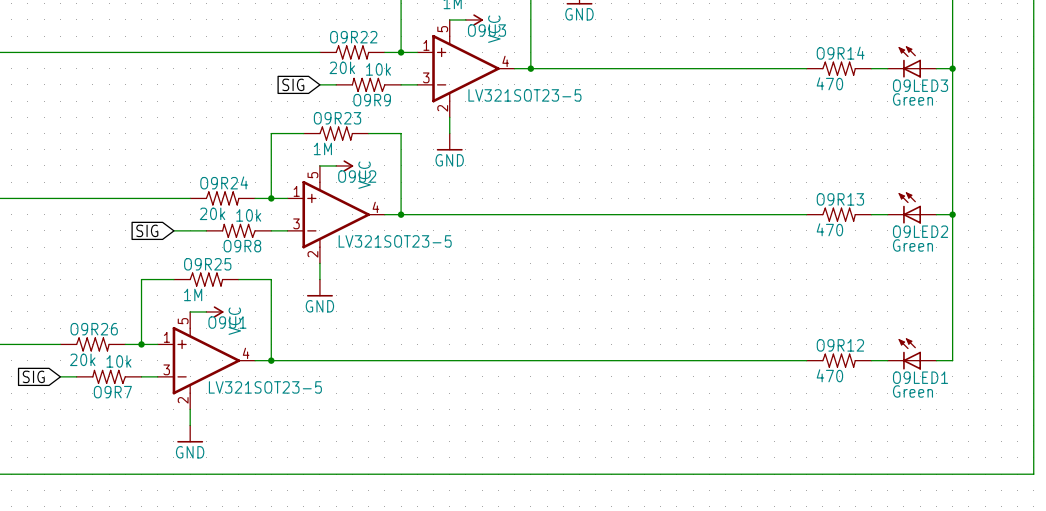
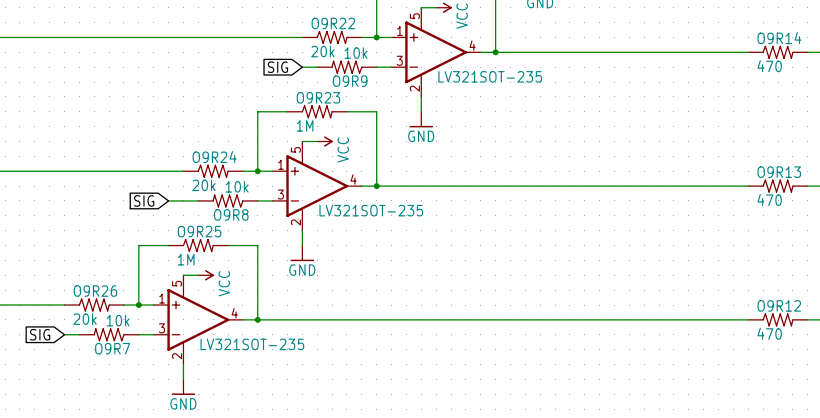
O9U3 name: O9U3 (486, 30) -> none
O9U3 value: LV321SOT23-5 (524, 95) -> LV321SOT-235 (490, 76)
O9U2 name: O9U2 (357, 176) -> none
O9U2 value: LV321SOT23-5 (395, 241) -> LV321SOT-235 (371, 210)
O9U1 name: O9U1 (227, 322) -> none
O9U1 value: LV321SOT23-5 (265, 387) -> LV321SOT-235 (252, 344)

